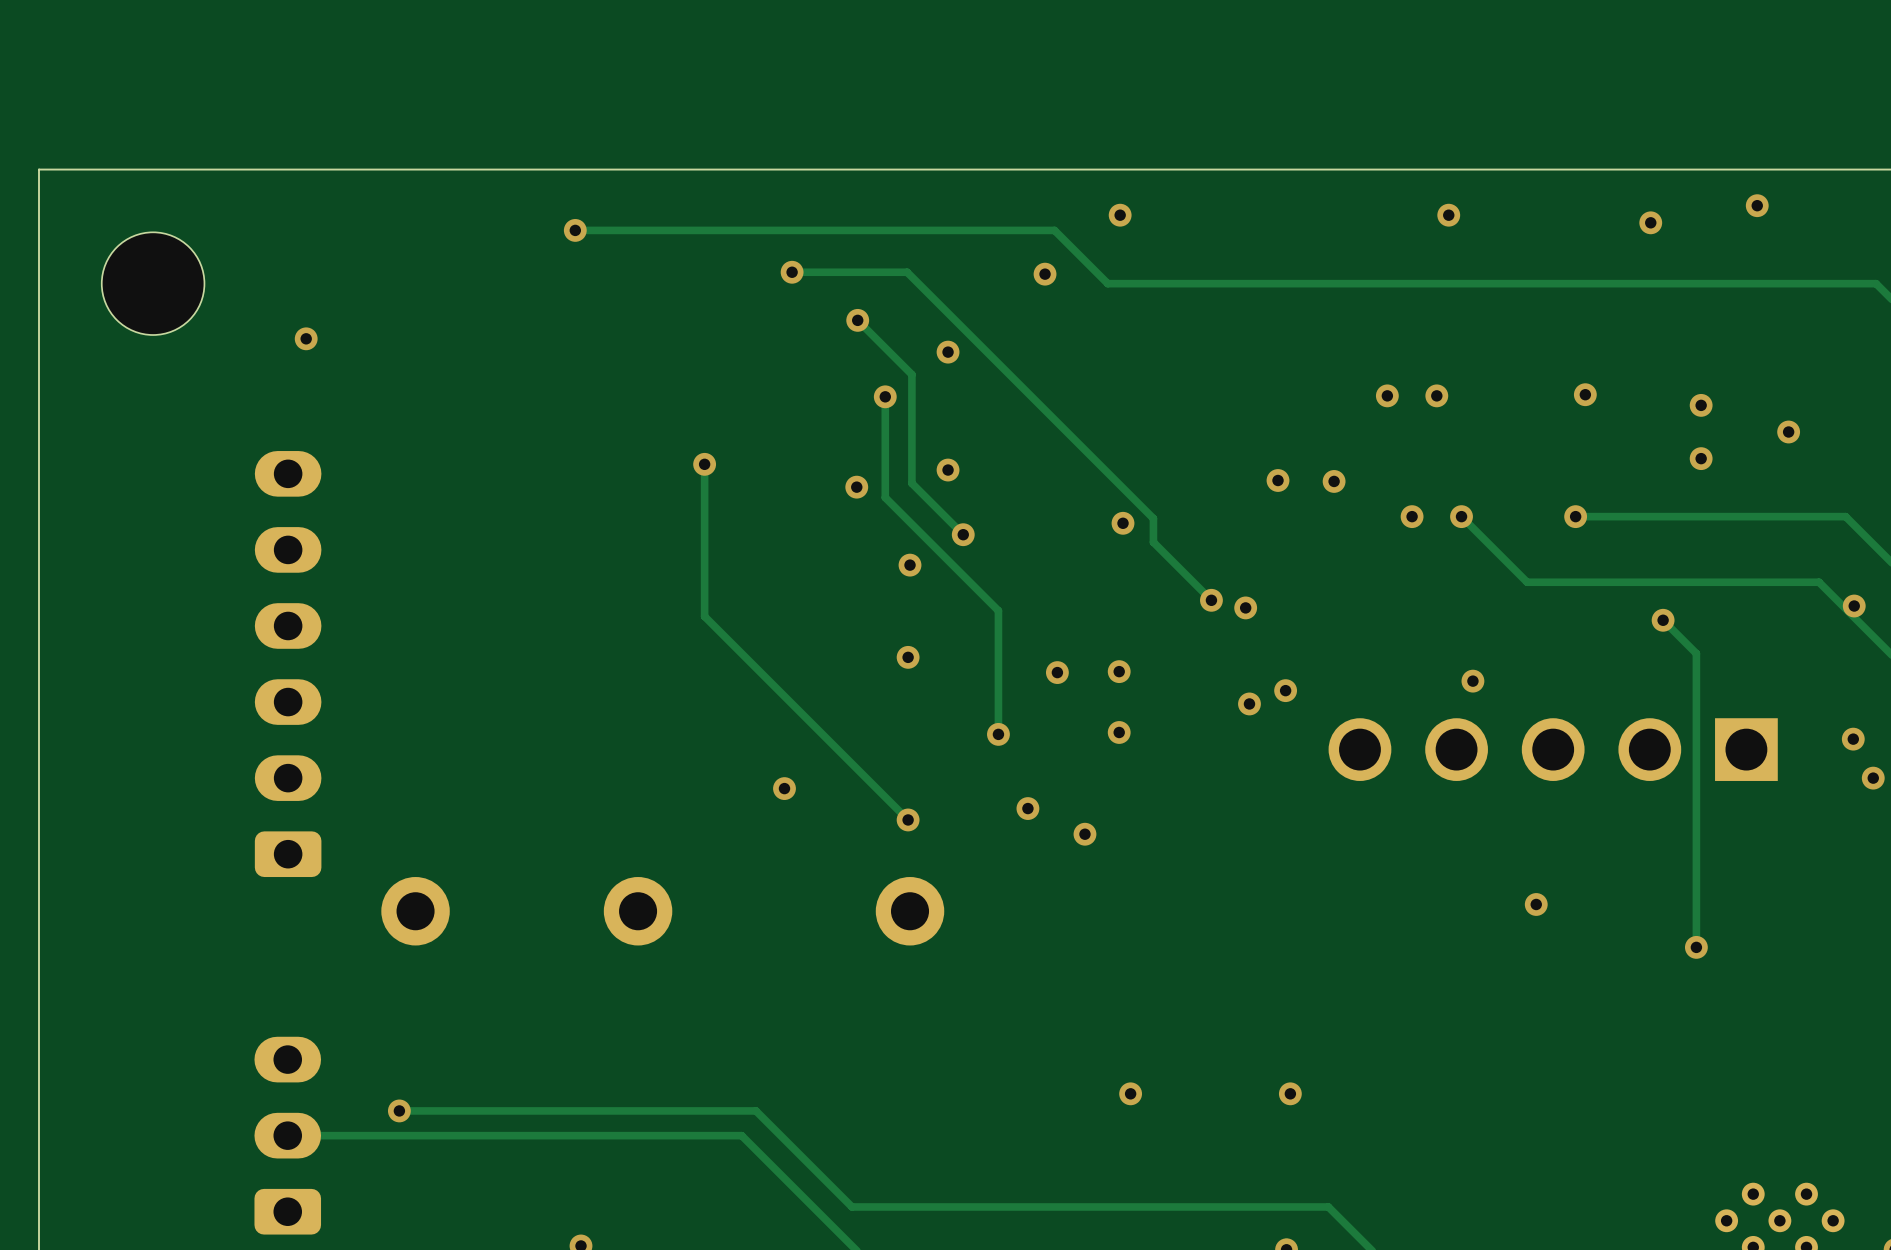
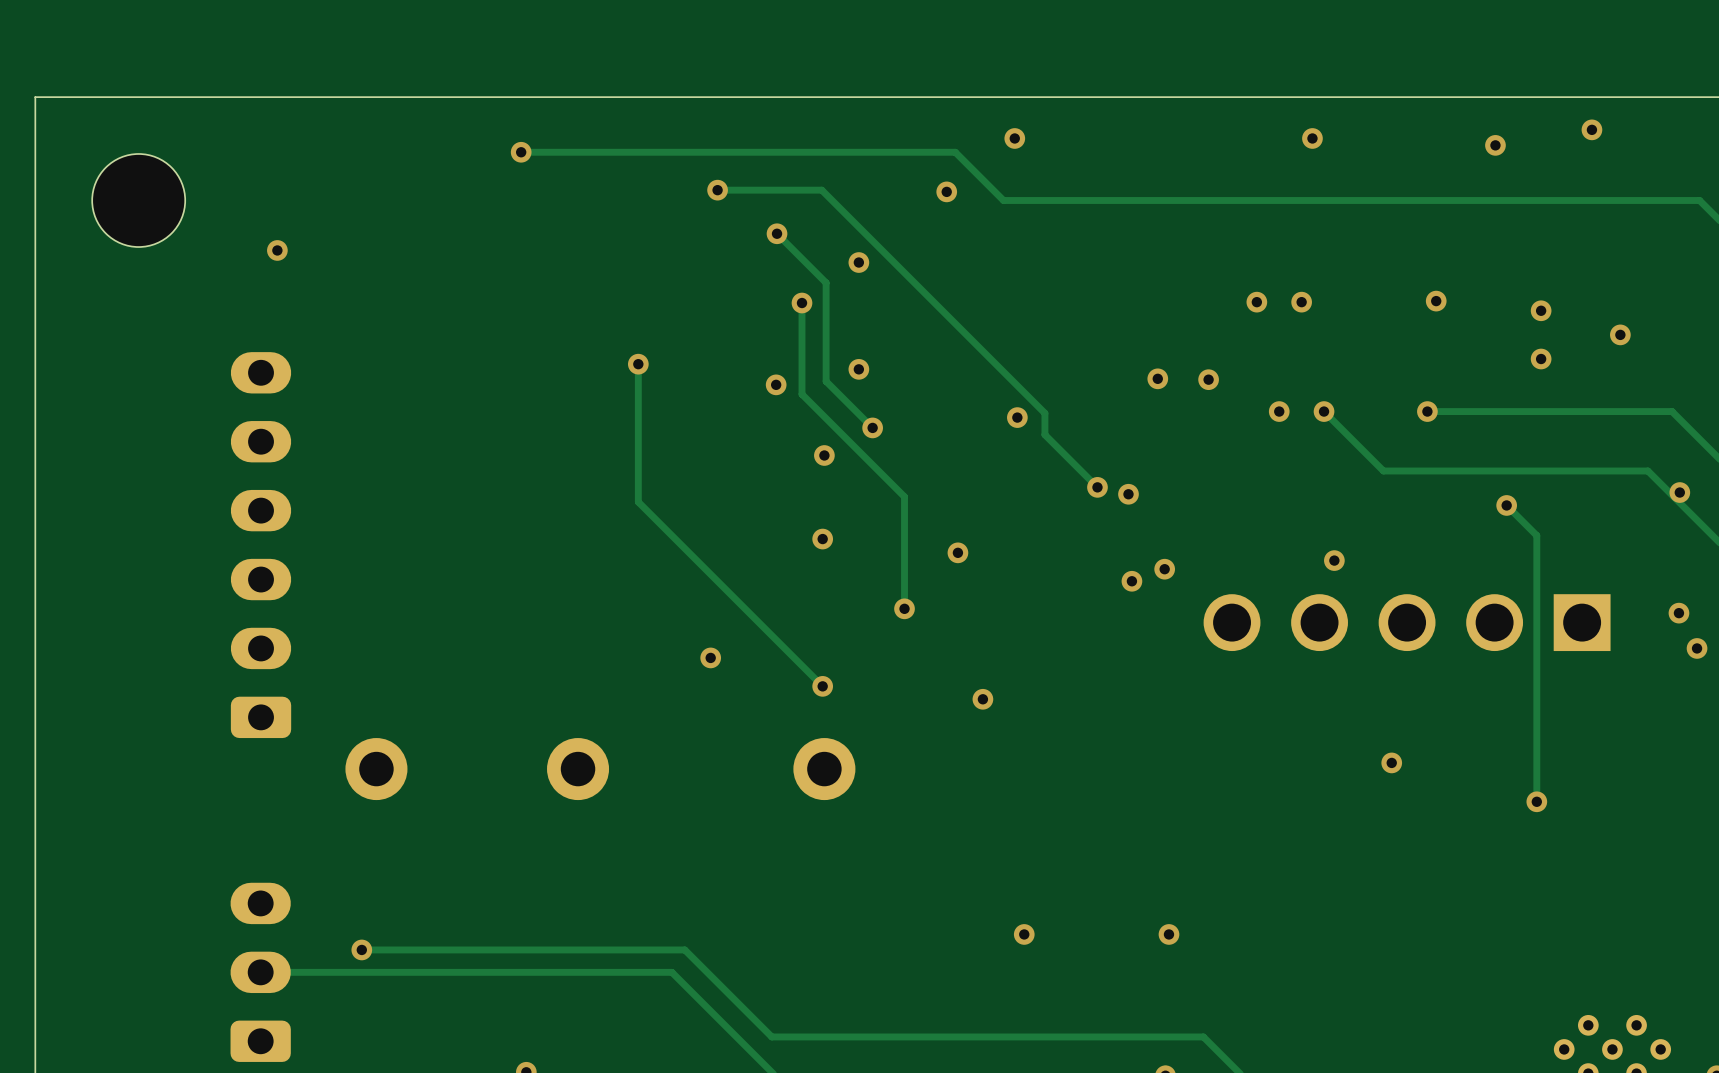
via: (1119, 671) -> none
via: (1119, 732) -> none
via: (1027, 808) -> none

